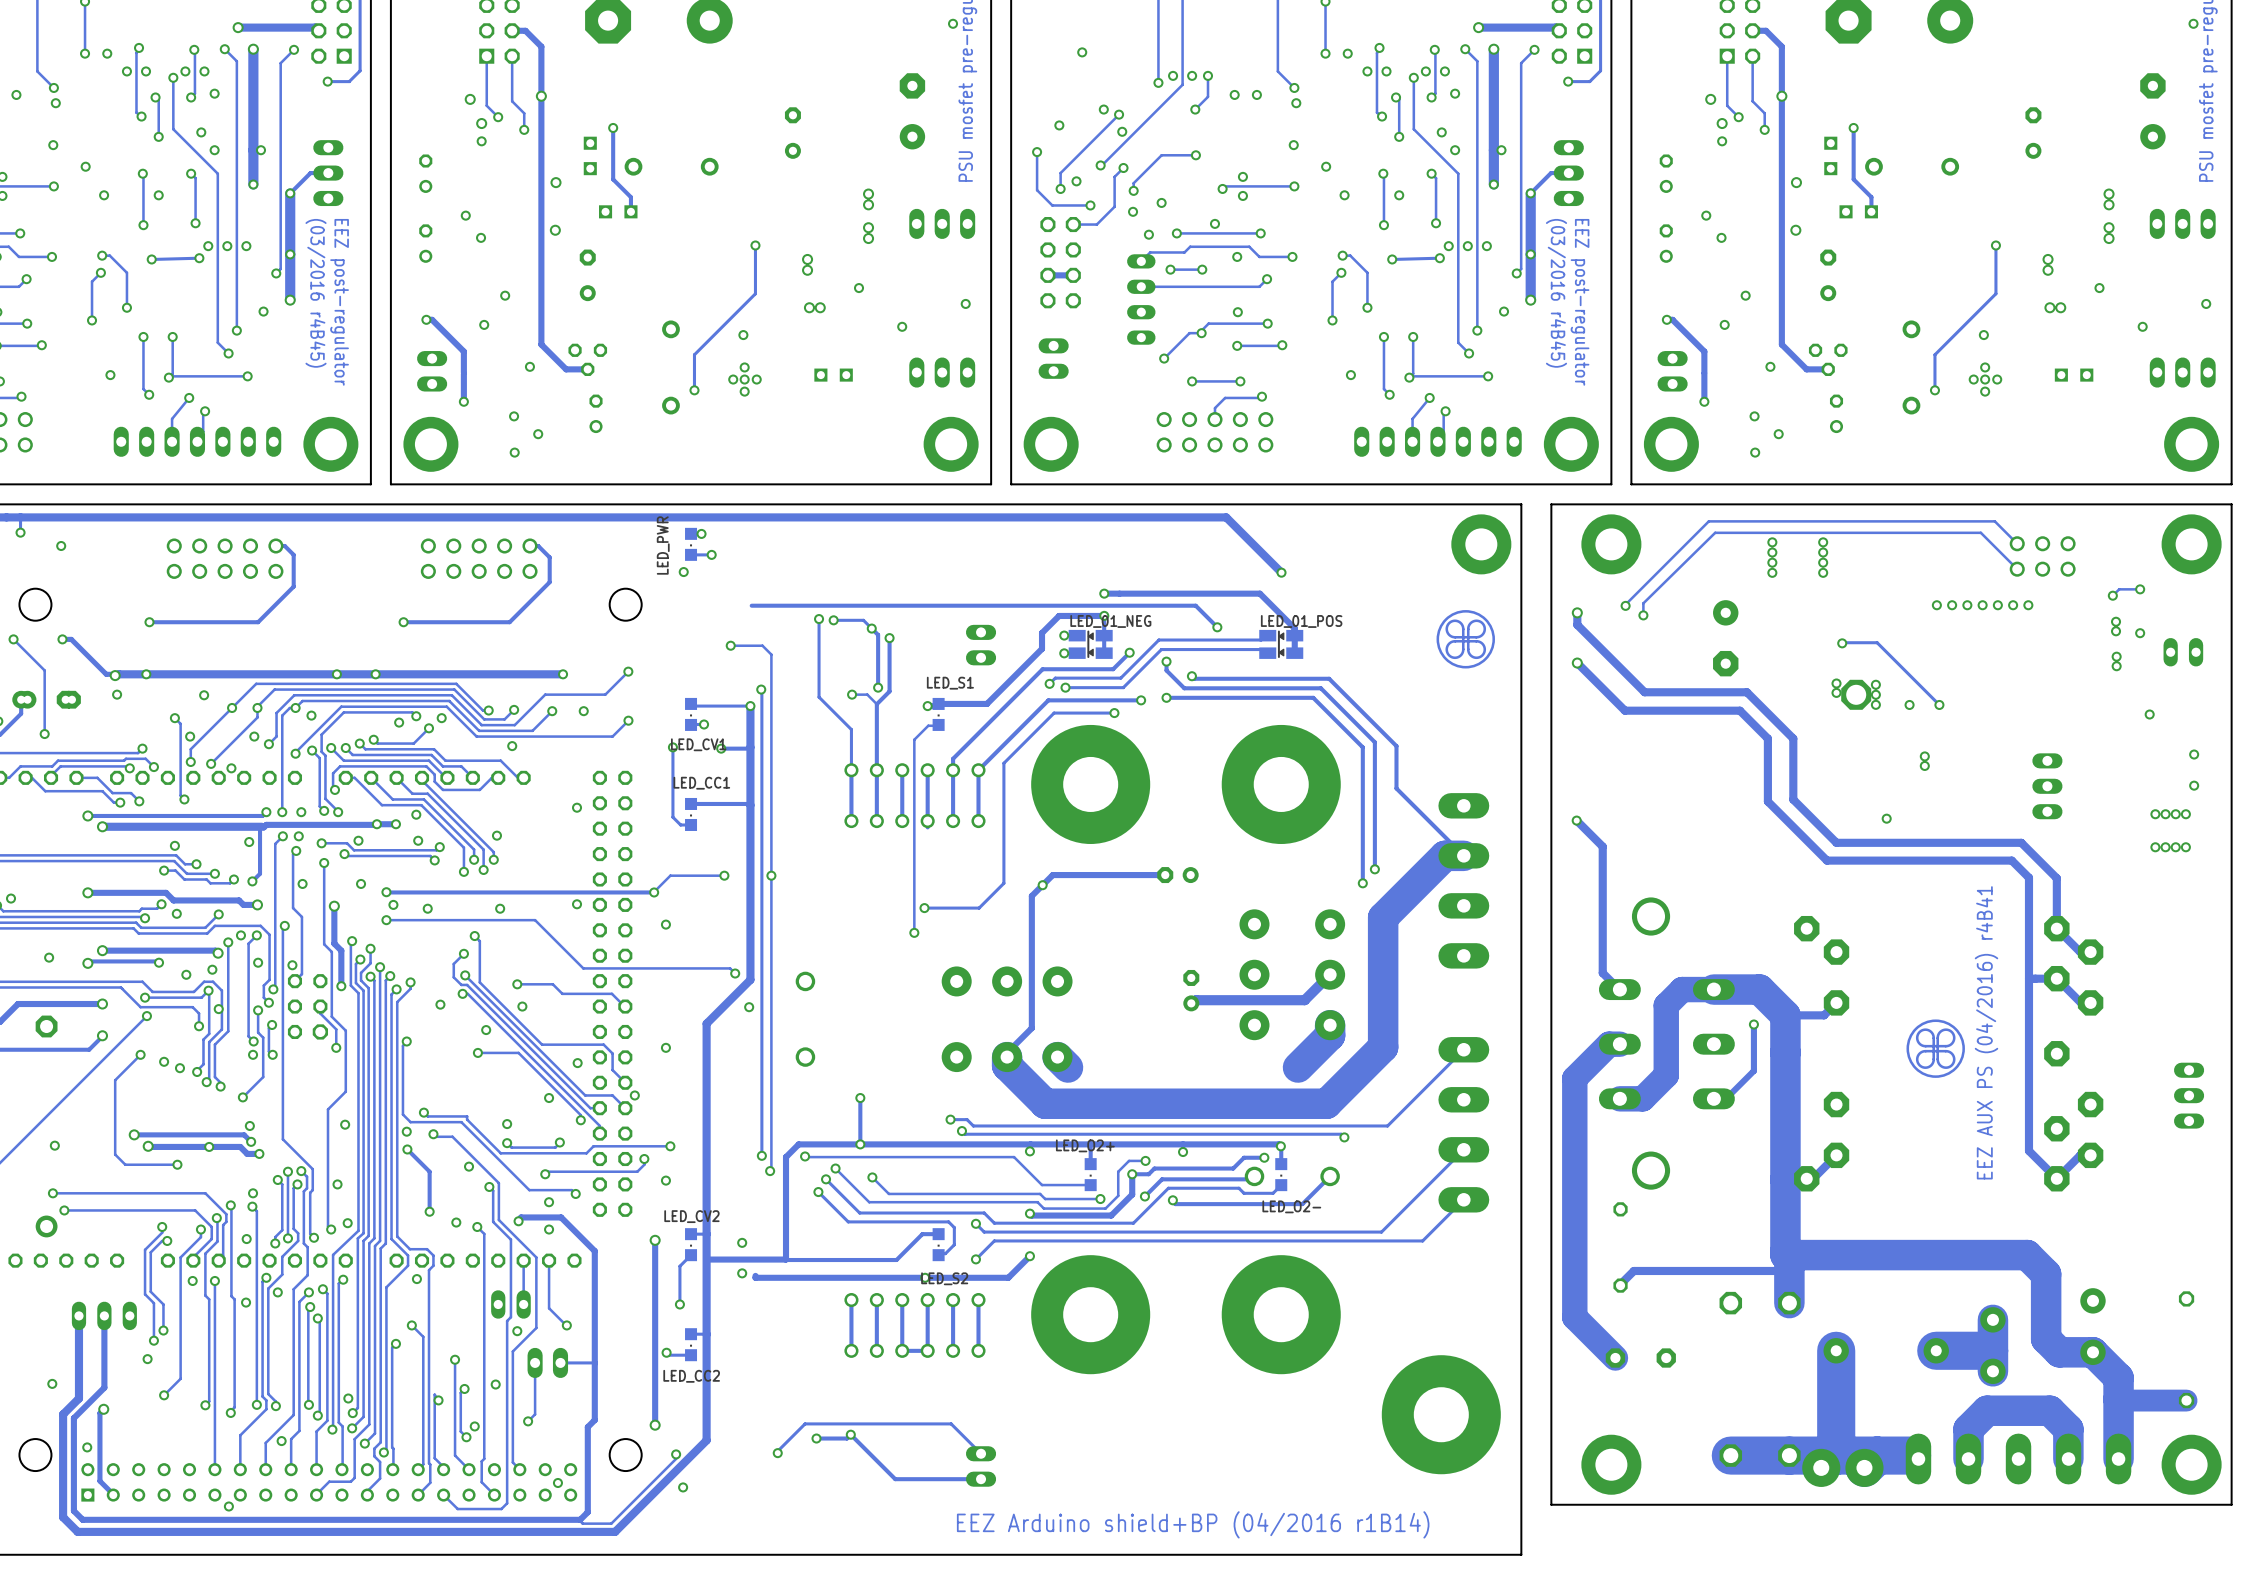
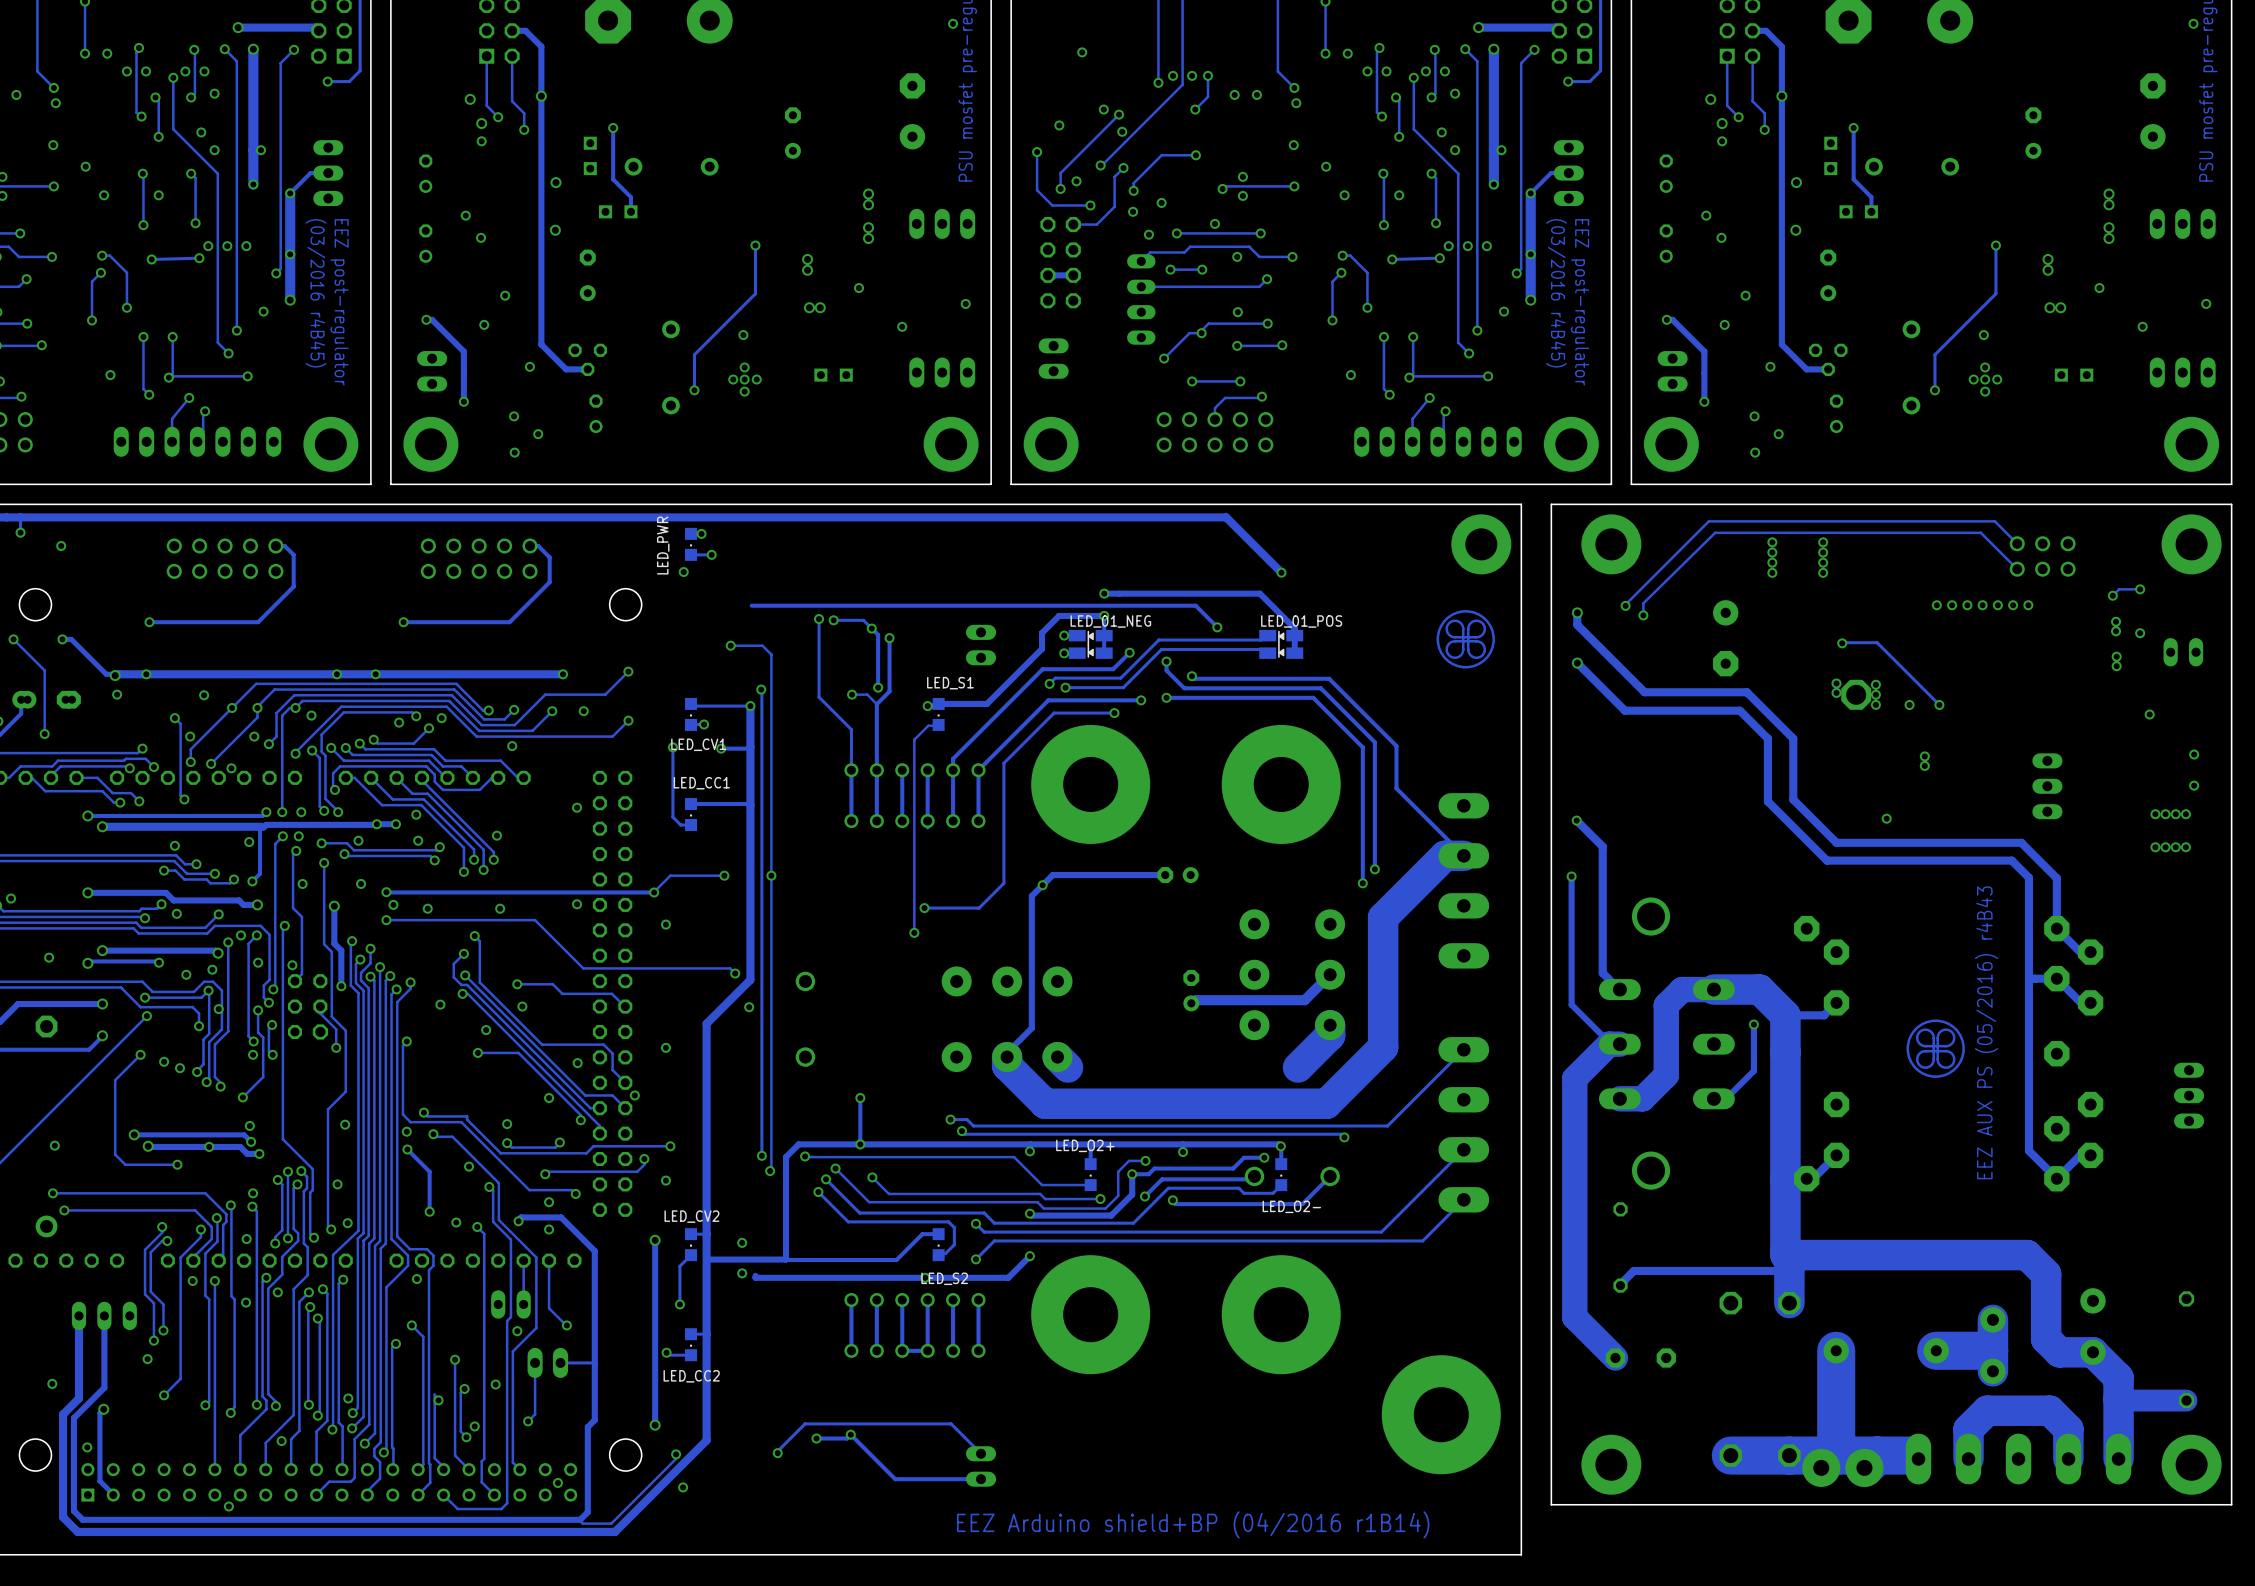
track: none -> (1571, 876) (1571, 1004) (1610, 1043)
via: none -> (1571, 876)
text: EEZ AUX PS (04/2016) r4B41 (1986, 1032) -> EEZ AUX PS (05/2016) r4B43 (1986, 1032)

